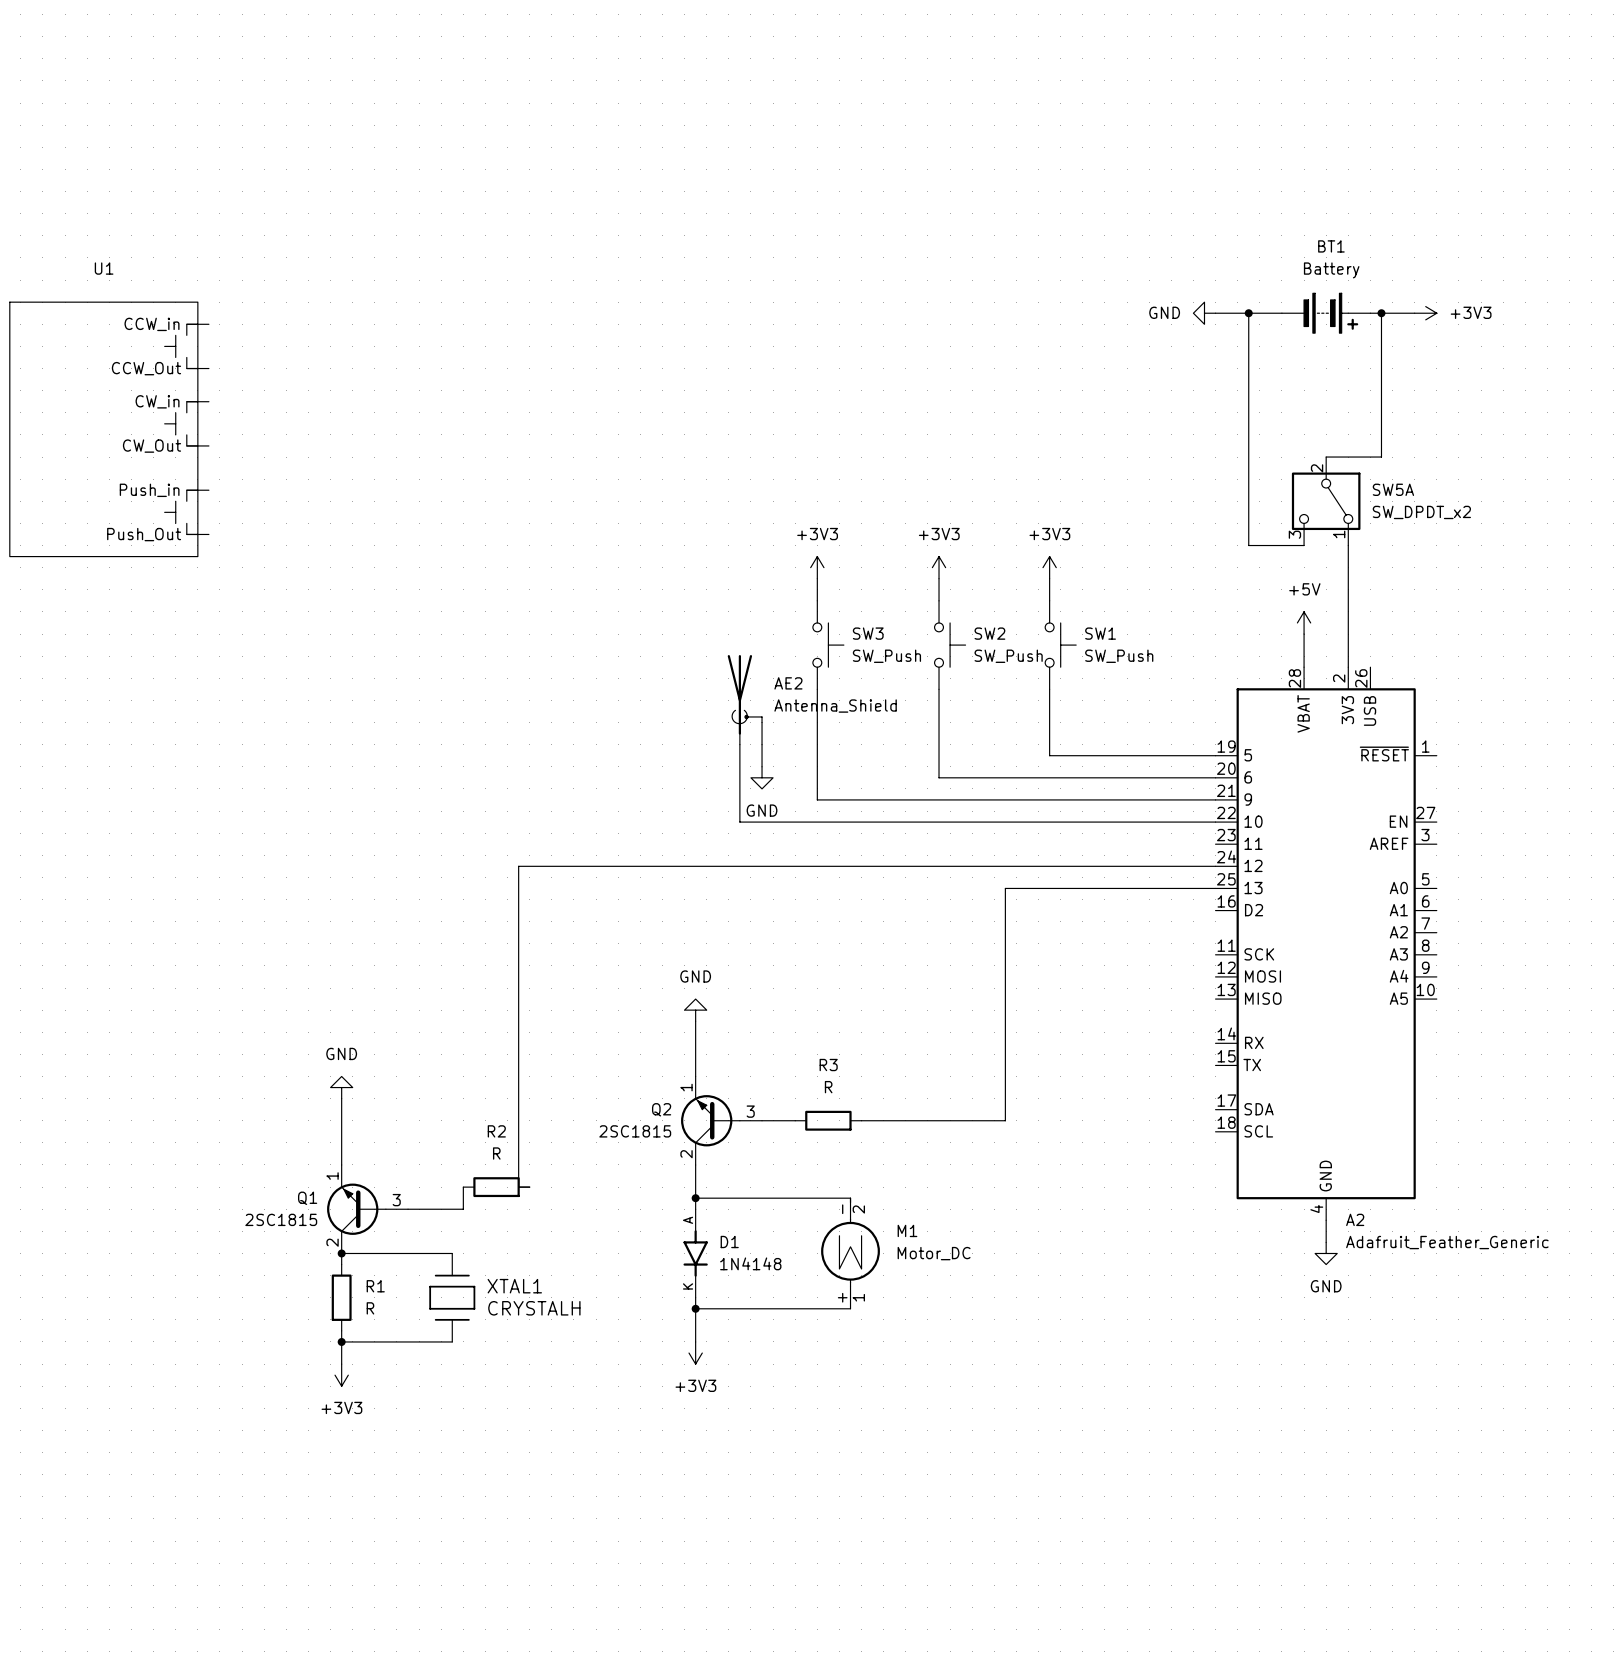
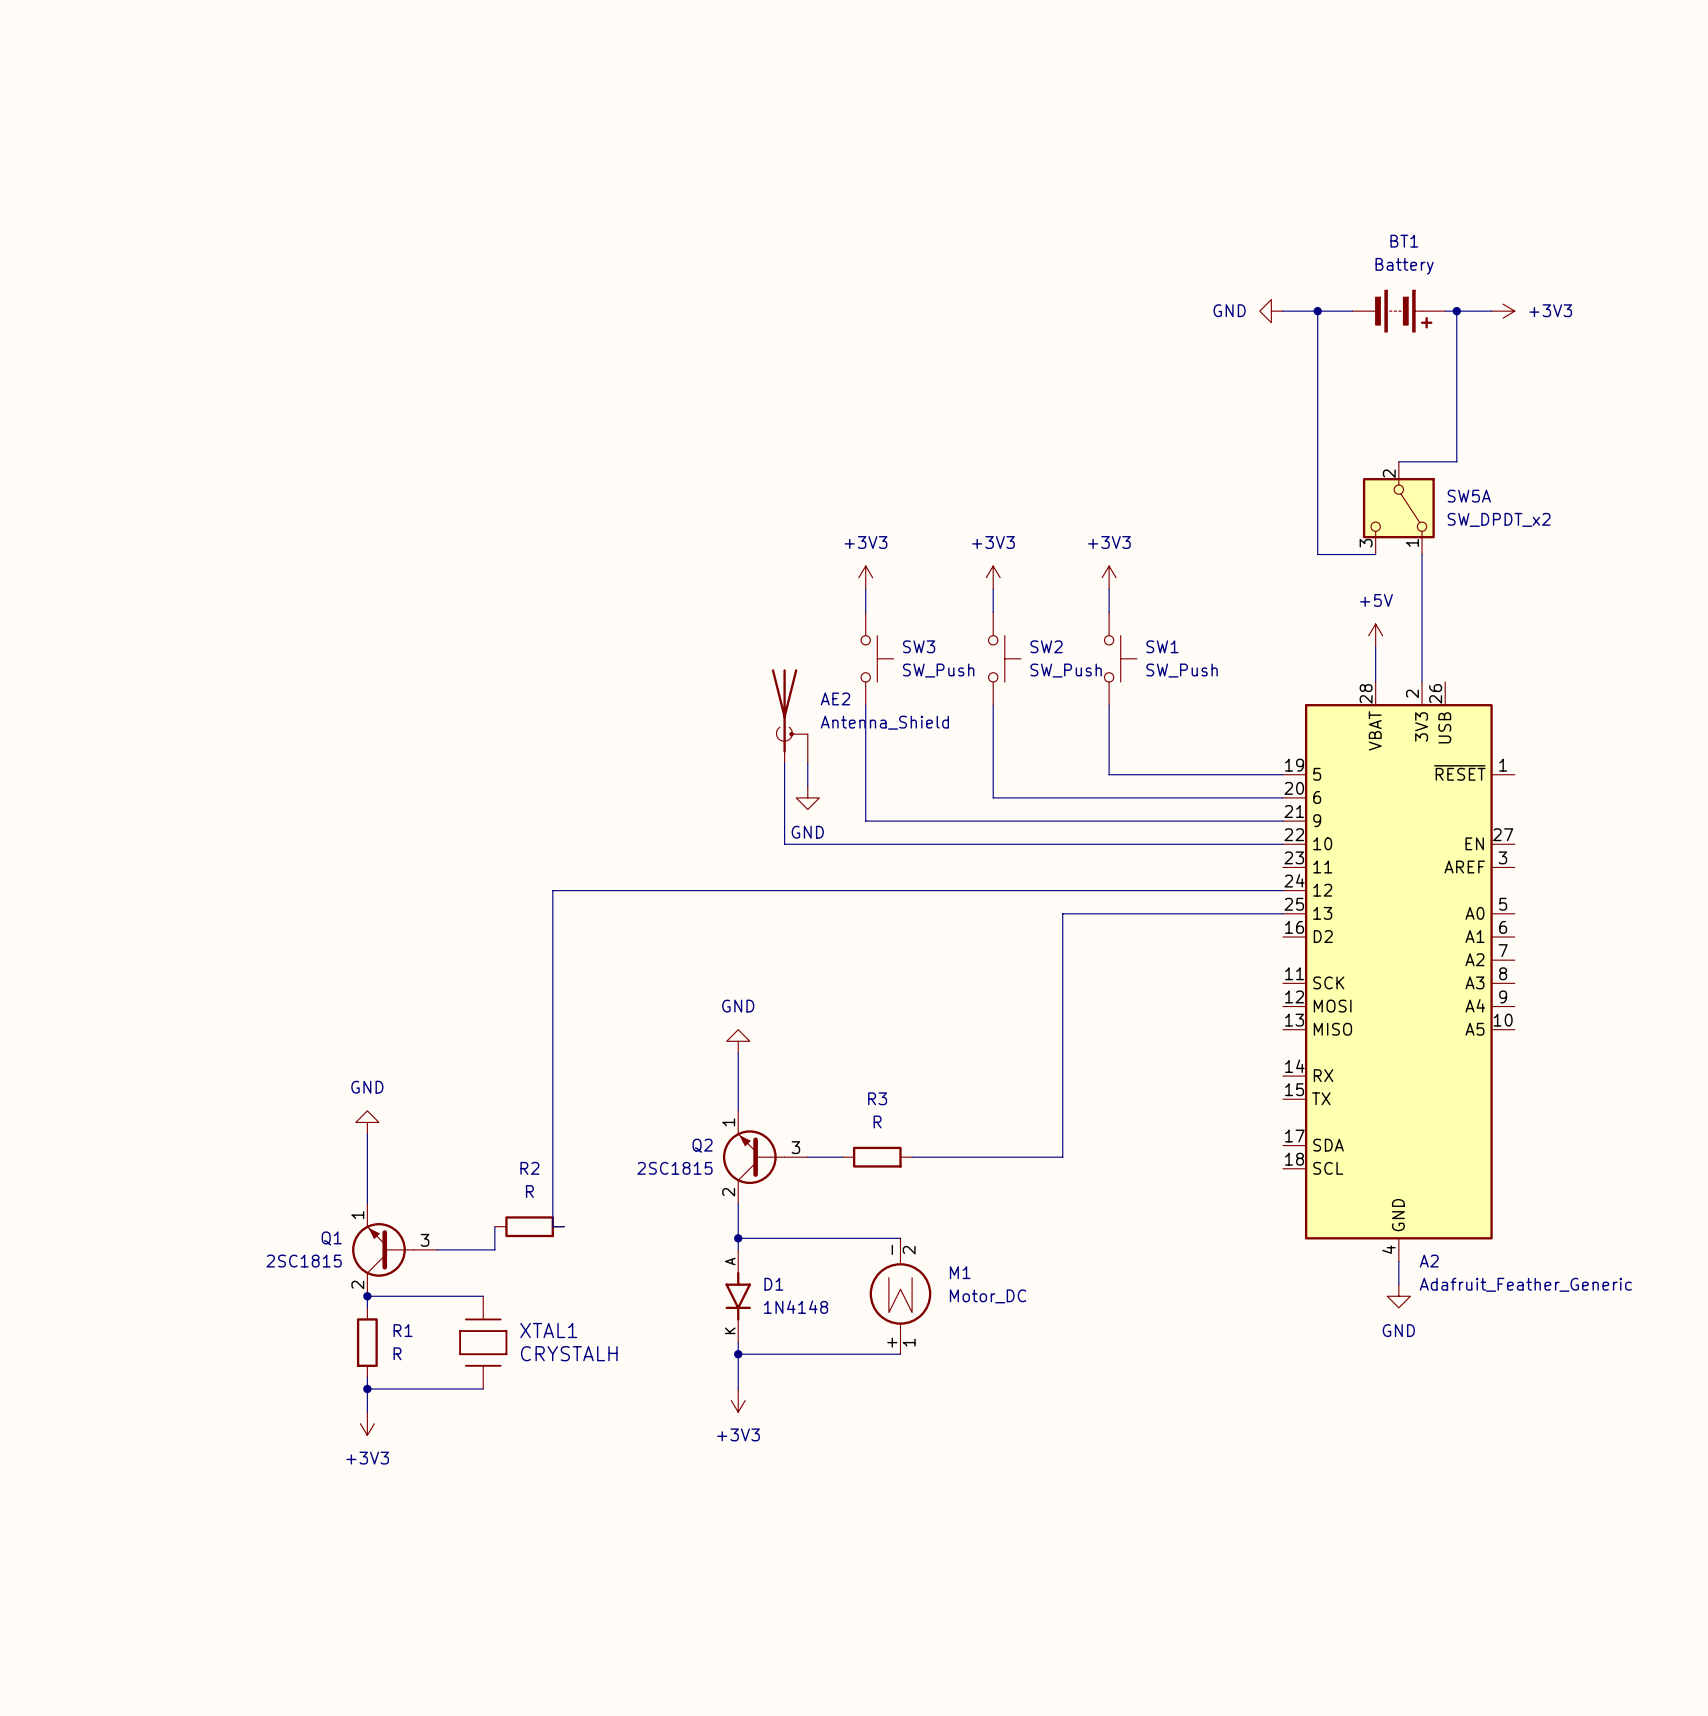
U1: (109, 429) -> none

